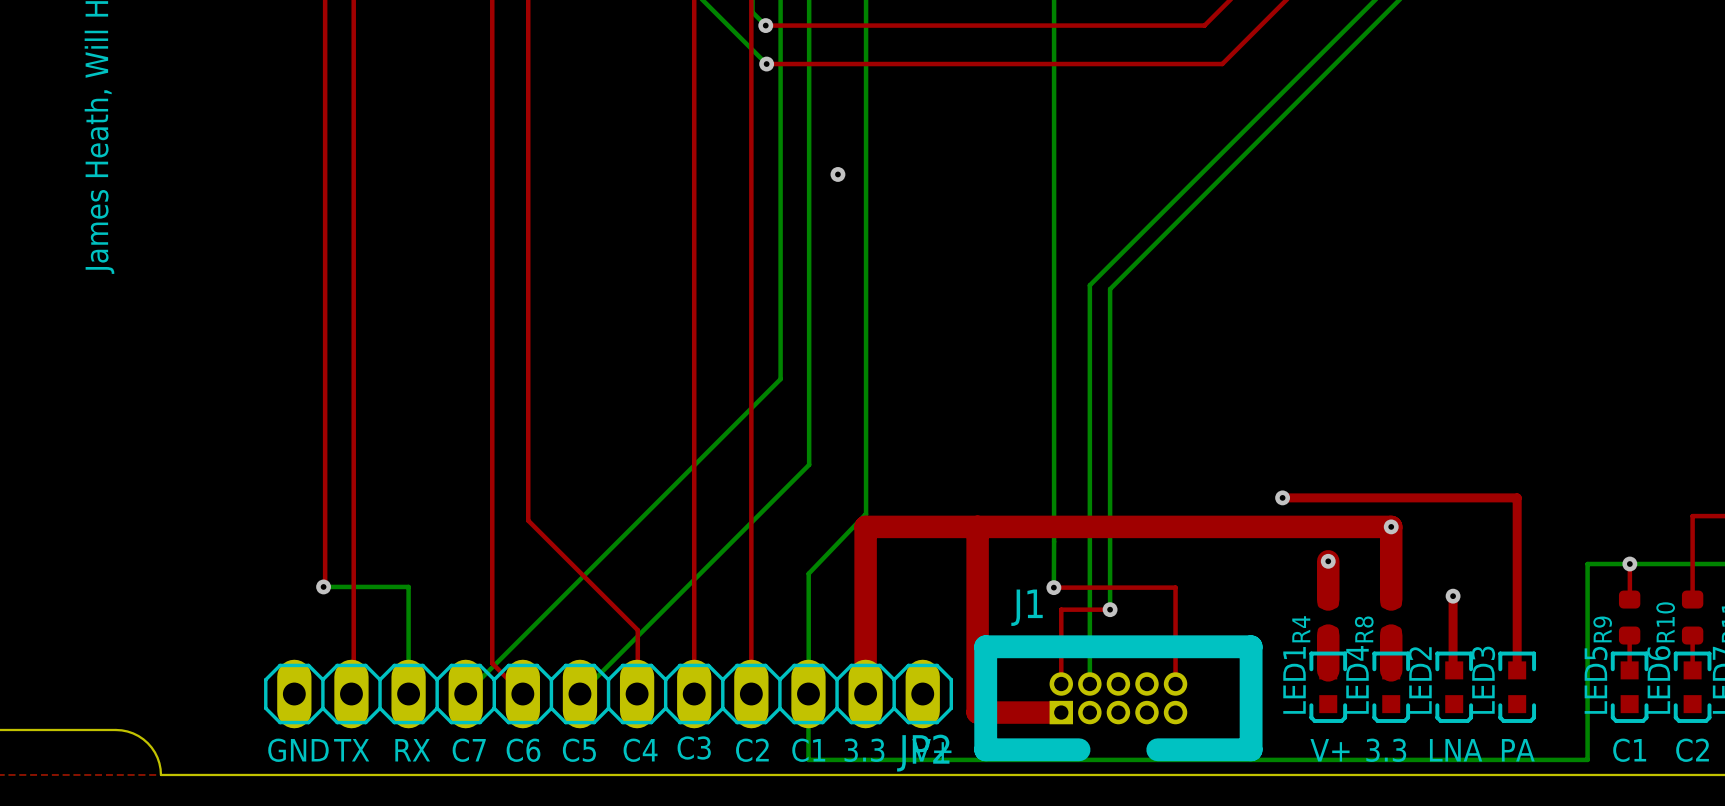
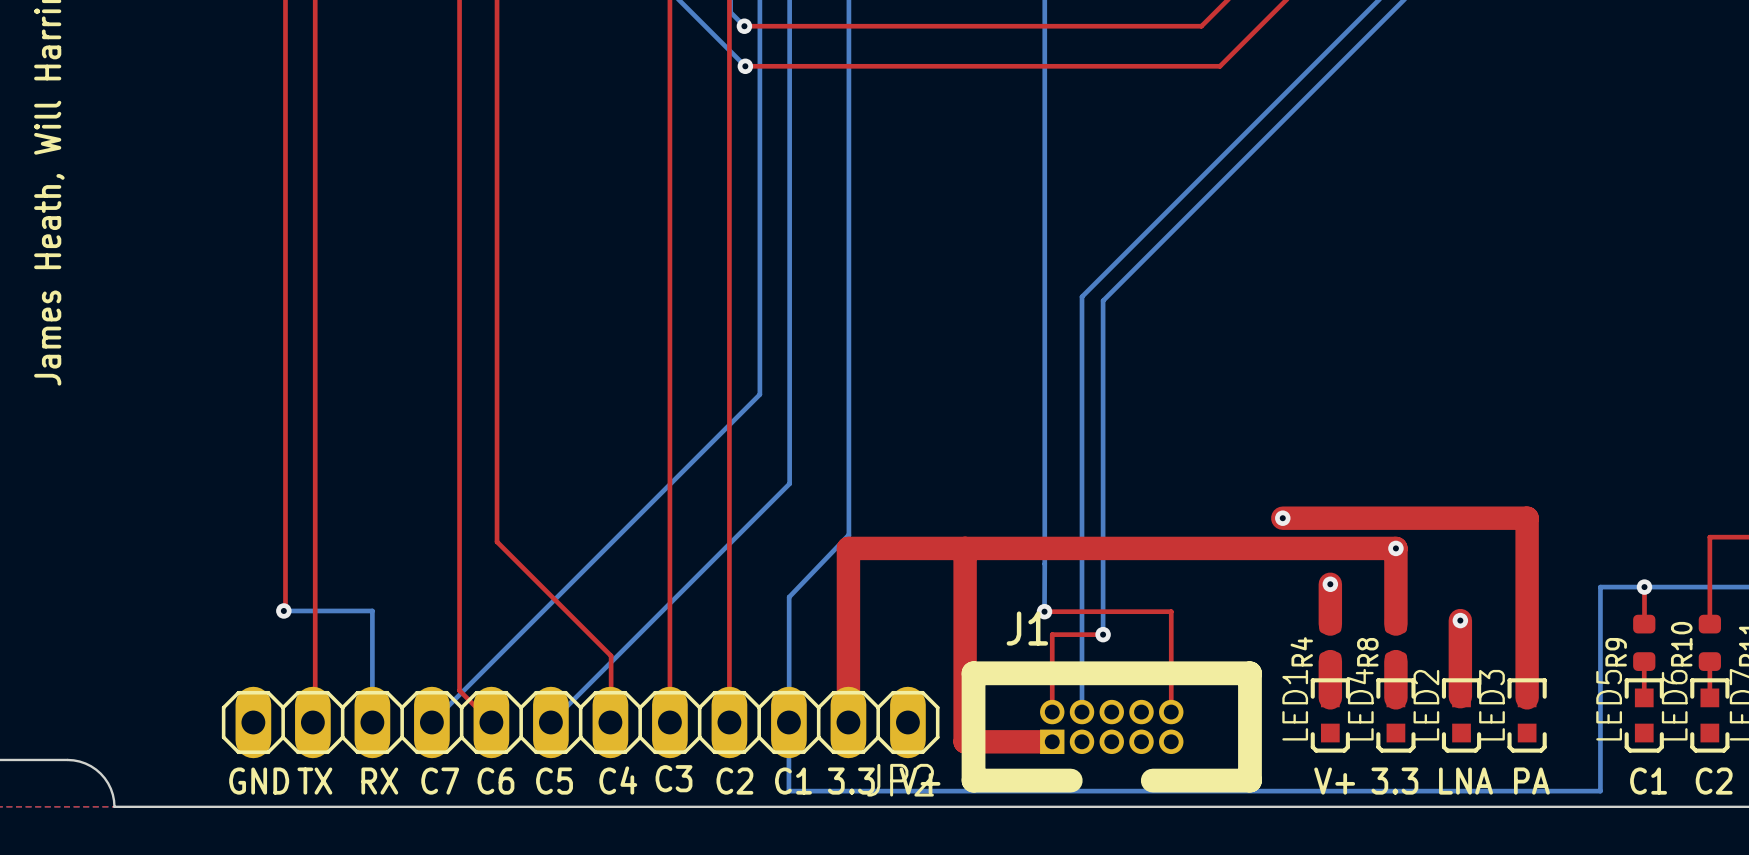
via: (837, 174) -> none
top track width: thin (1282, 497) (1517, 497) (1517, 670) -> thick (1282, 518) (1527, 518) (1527, 697)
top track width: thin (1453, 596) (1453, 669) -> thick (1460, 620) (1460, 696)

